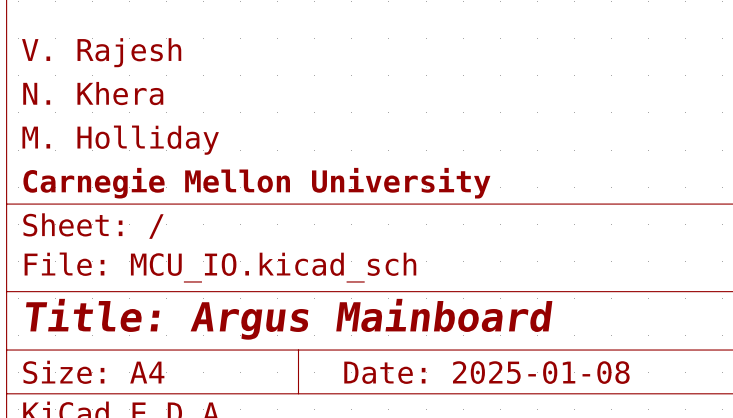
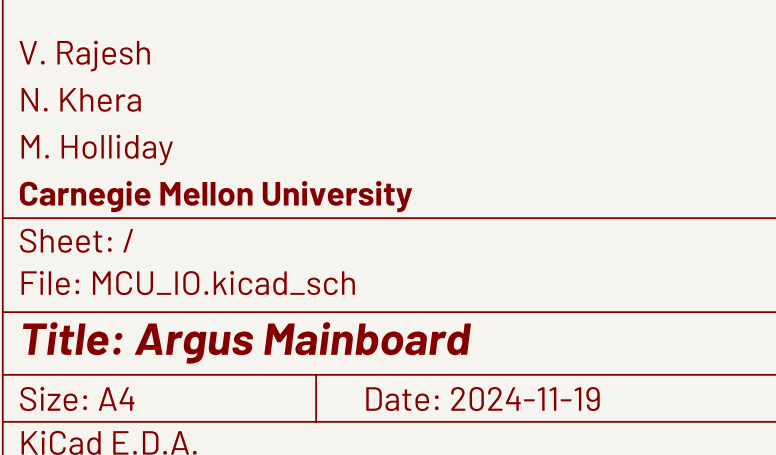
title block: Date: 2025-01-08 (486, 372) -> Date: 2024-11-19 (483, 399)

